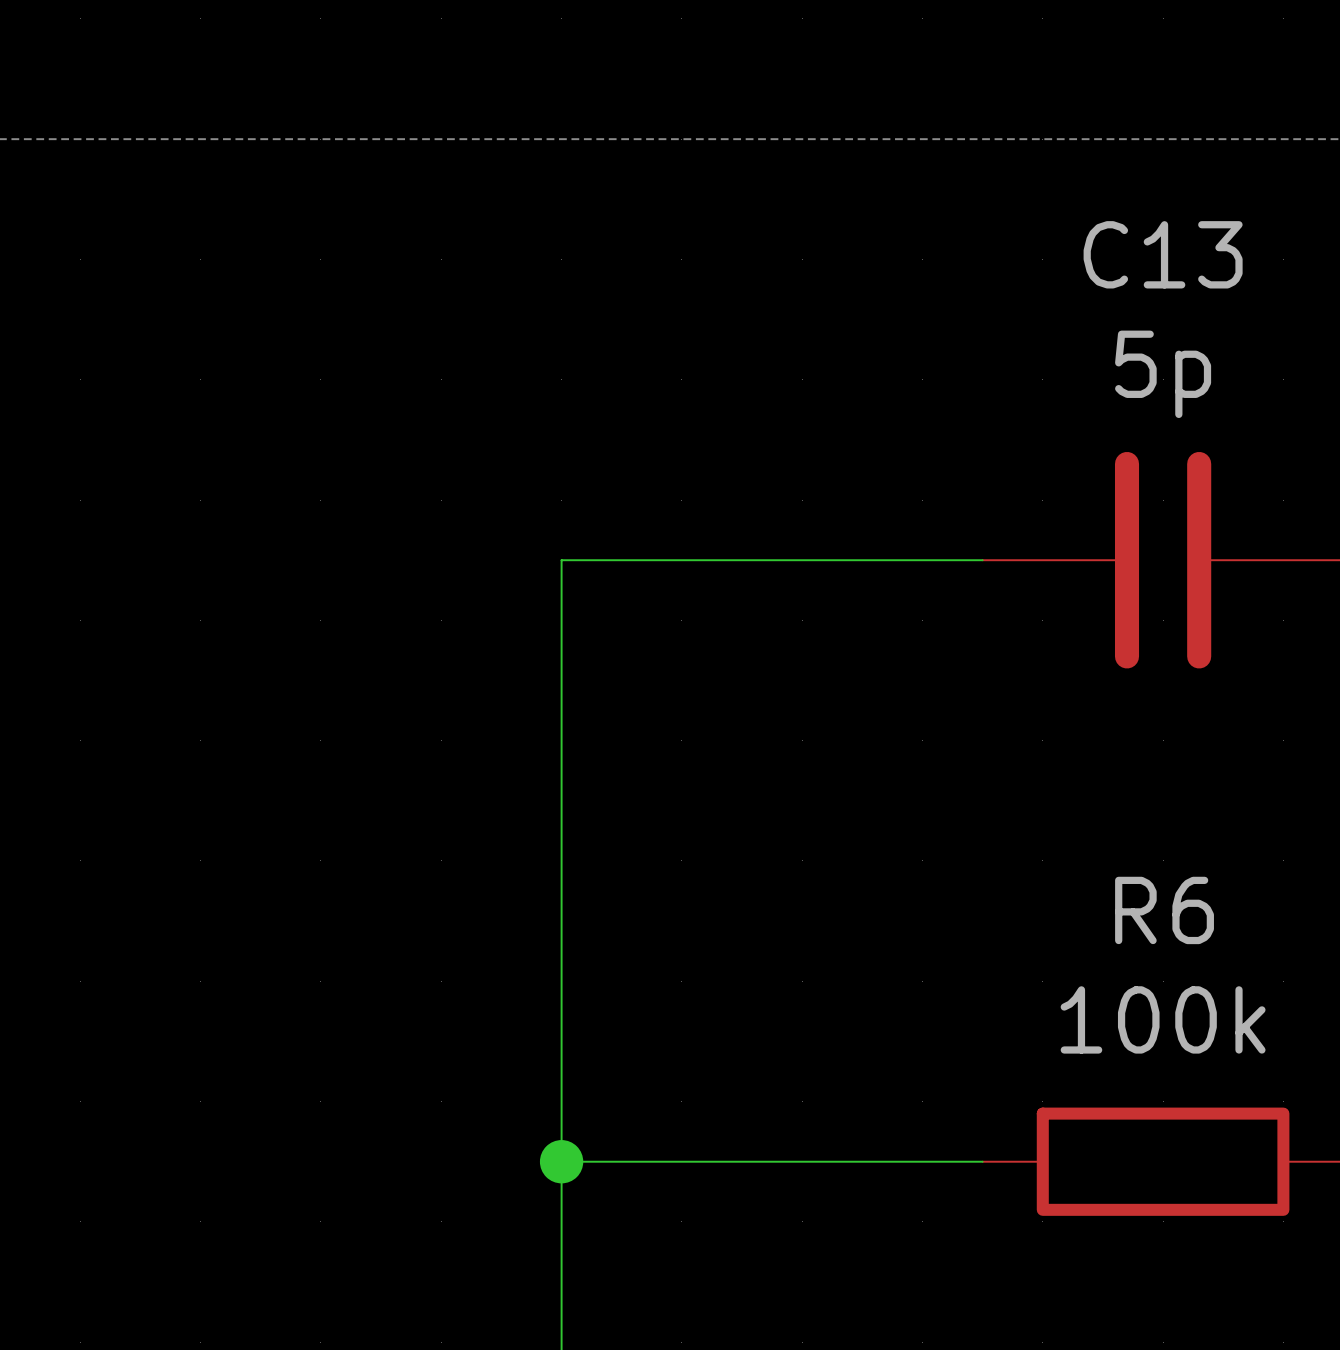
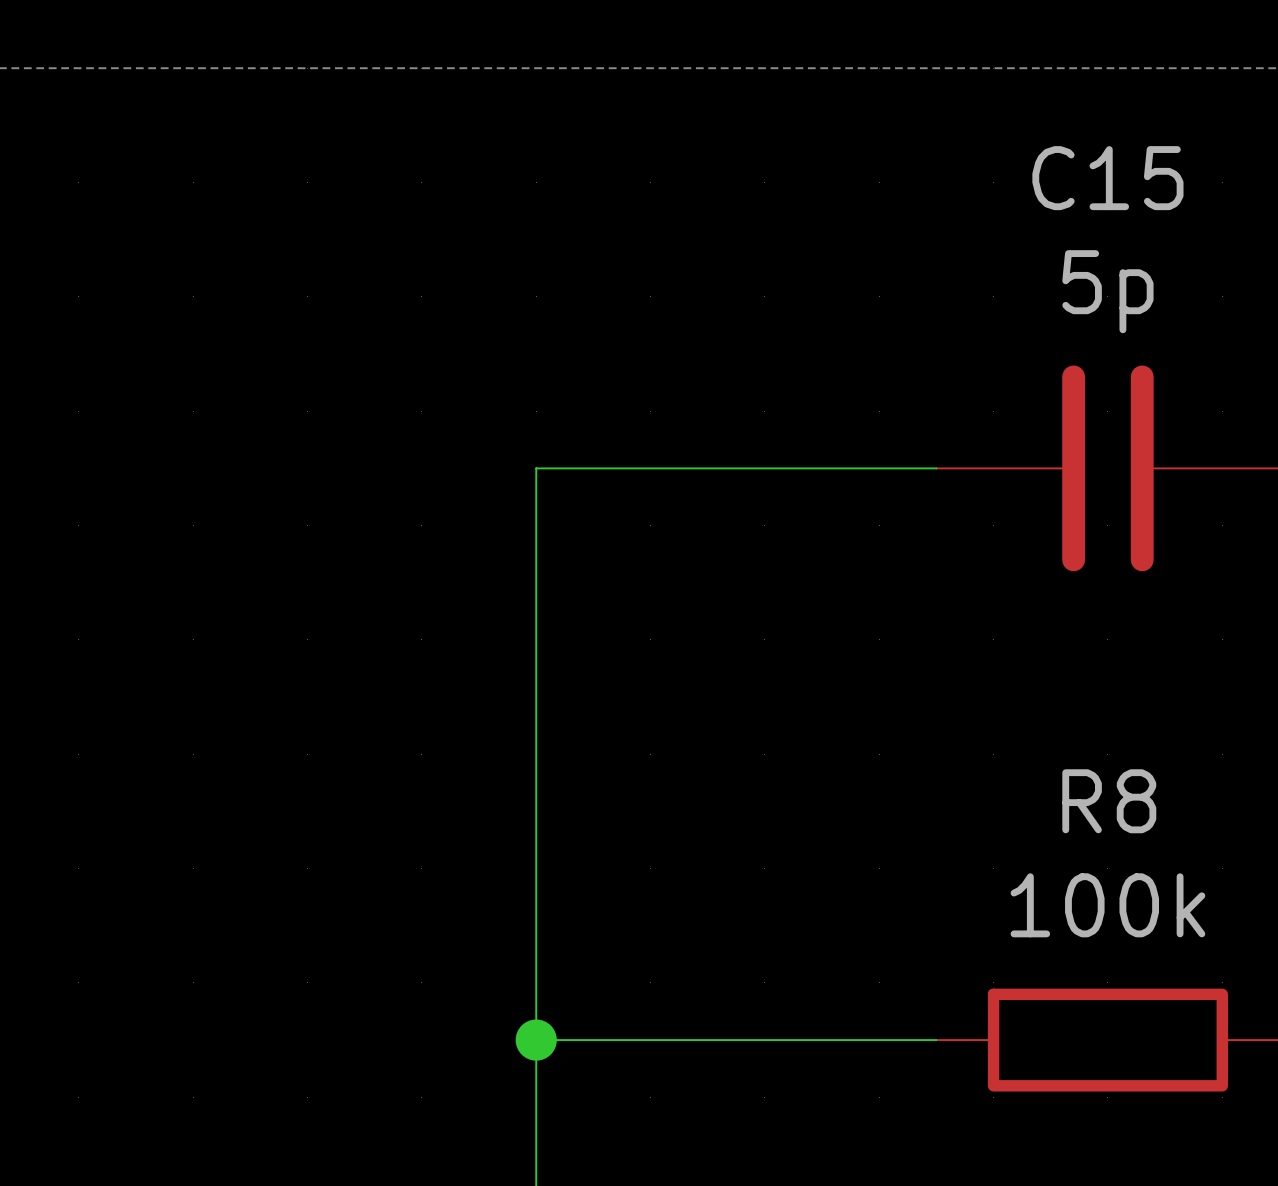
C13 name: C13 (1163, 254) -> C15 (1107, 178)
R6 name: R6 (1164, 910) -> R8 (1109, 801)

